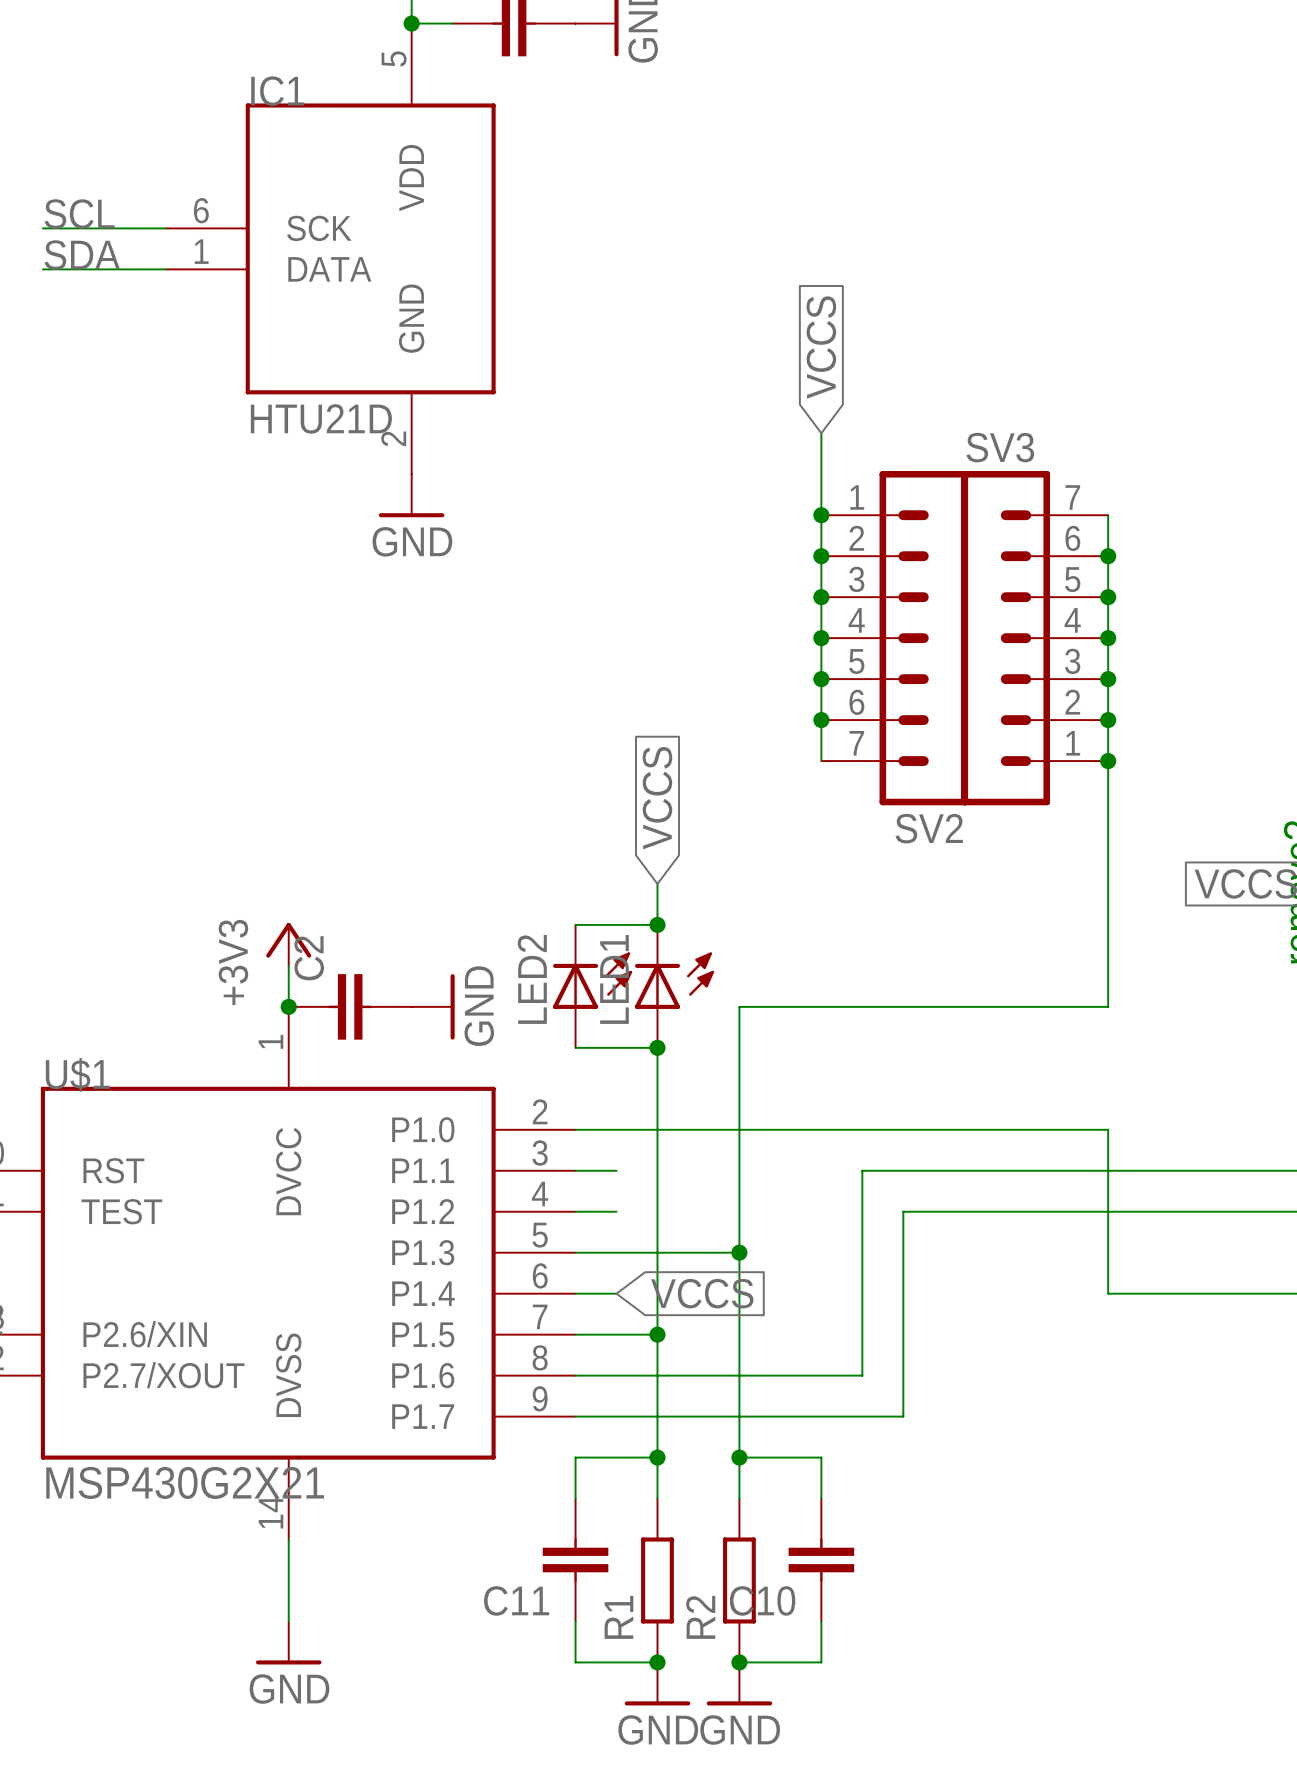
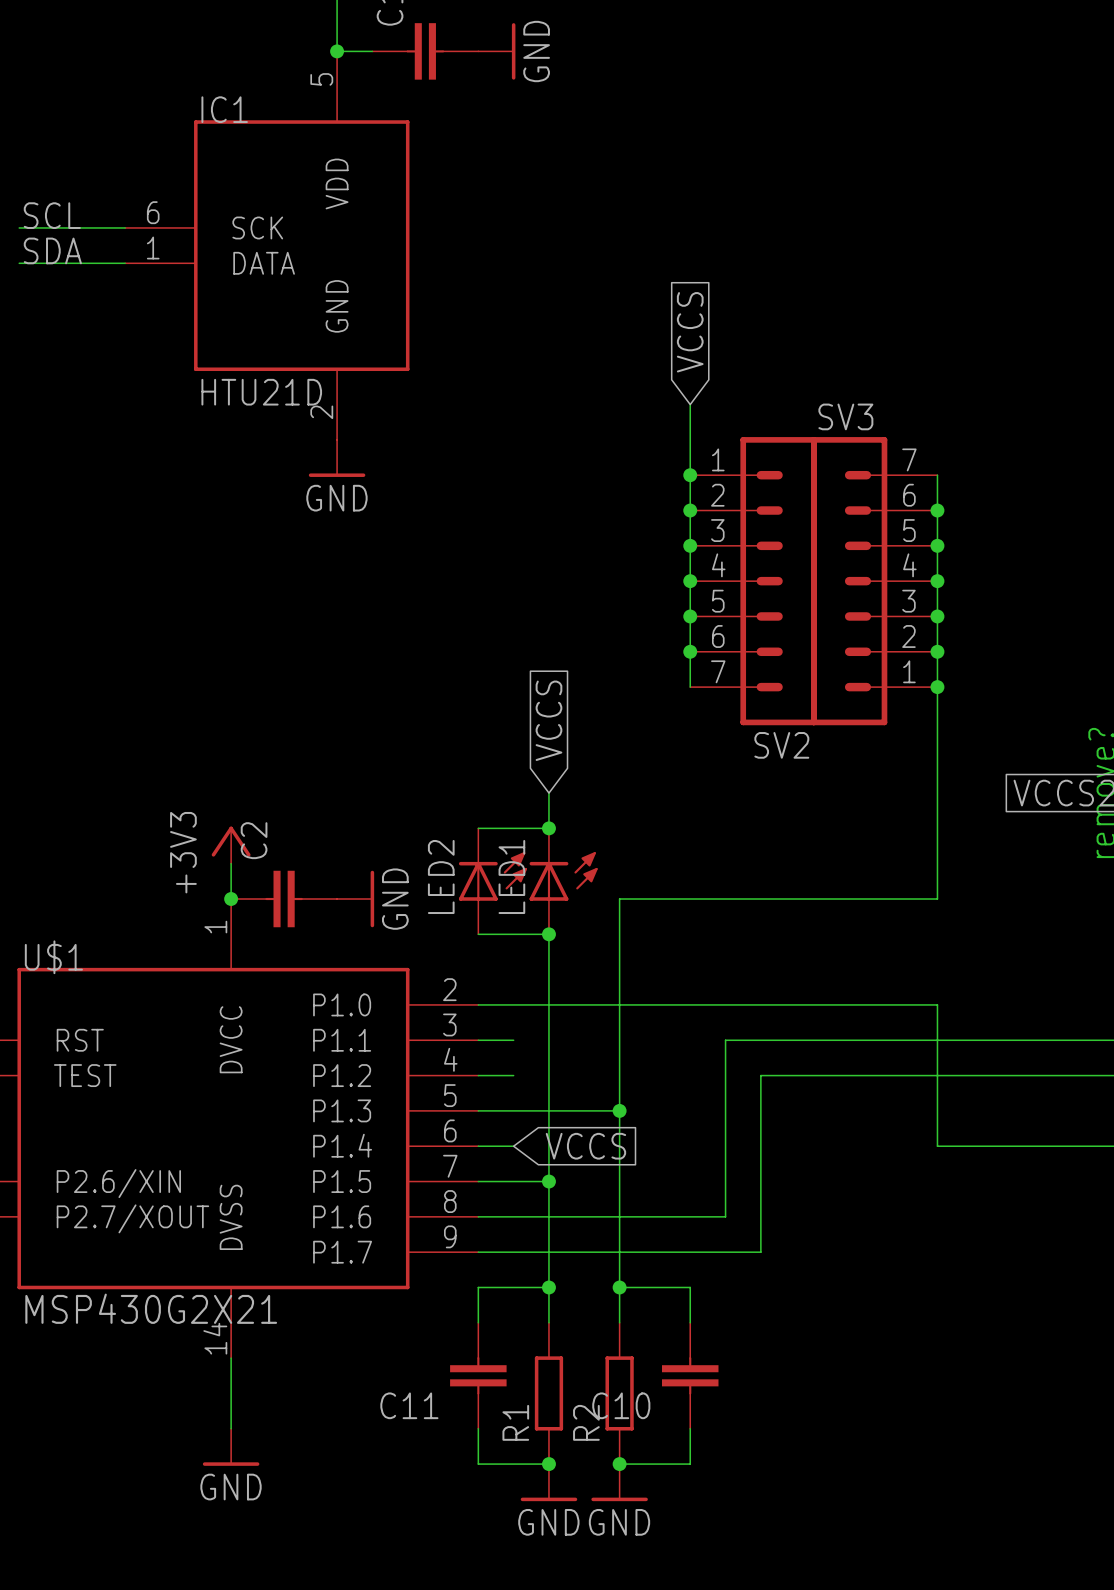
C2 name position: C2 (309, 958) -> C2 (254, 840)
C11 name position: C11 (516, 1600) -> C11 (409, 1405)
C10 name position: C10 (762, 1600) -> C10 (621, 1405)

